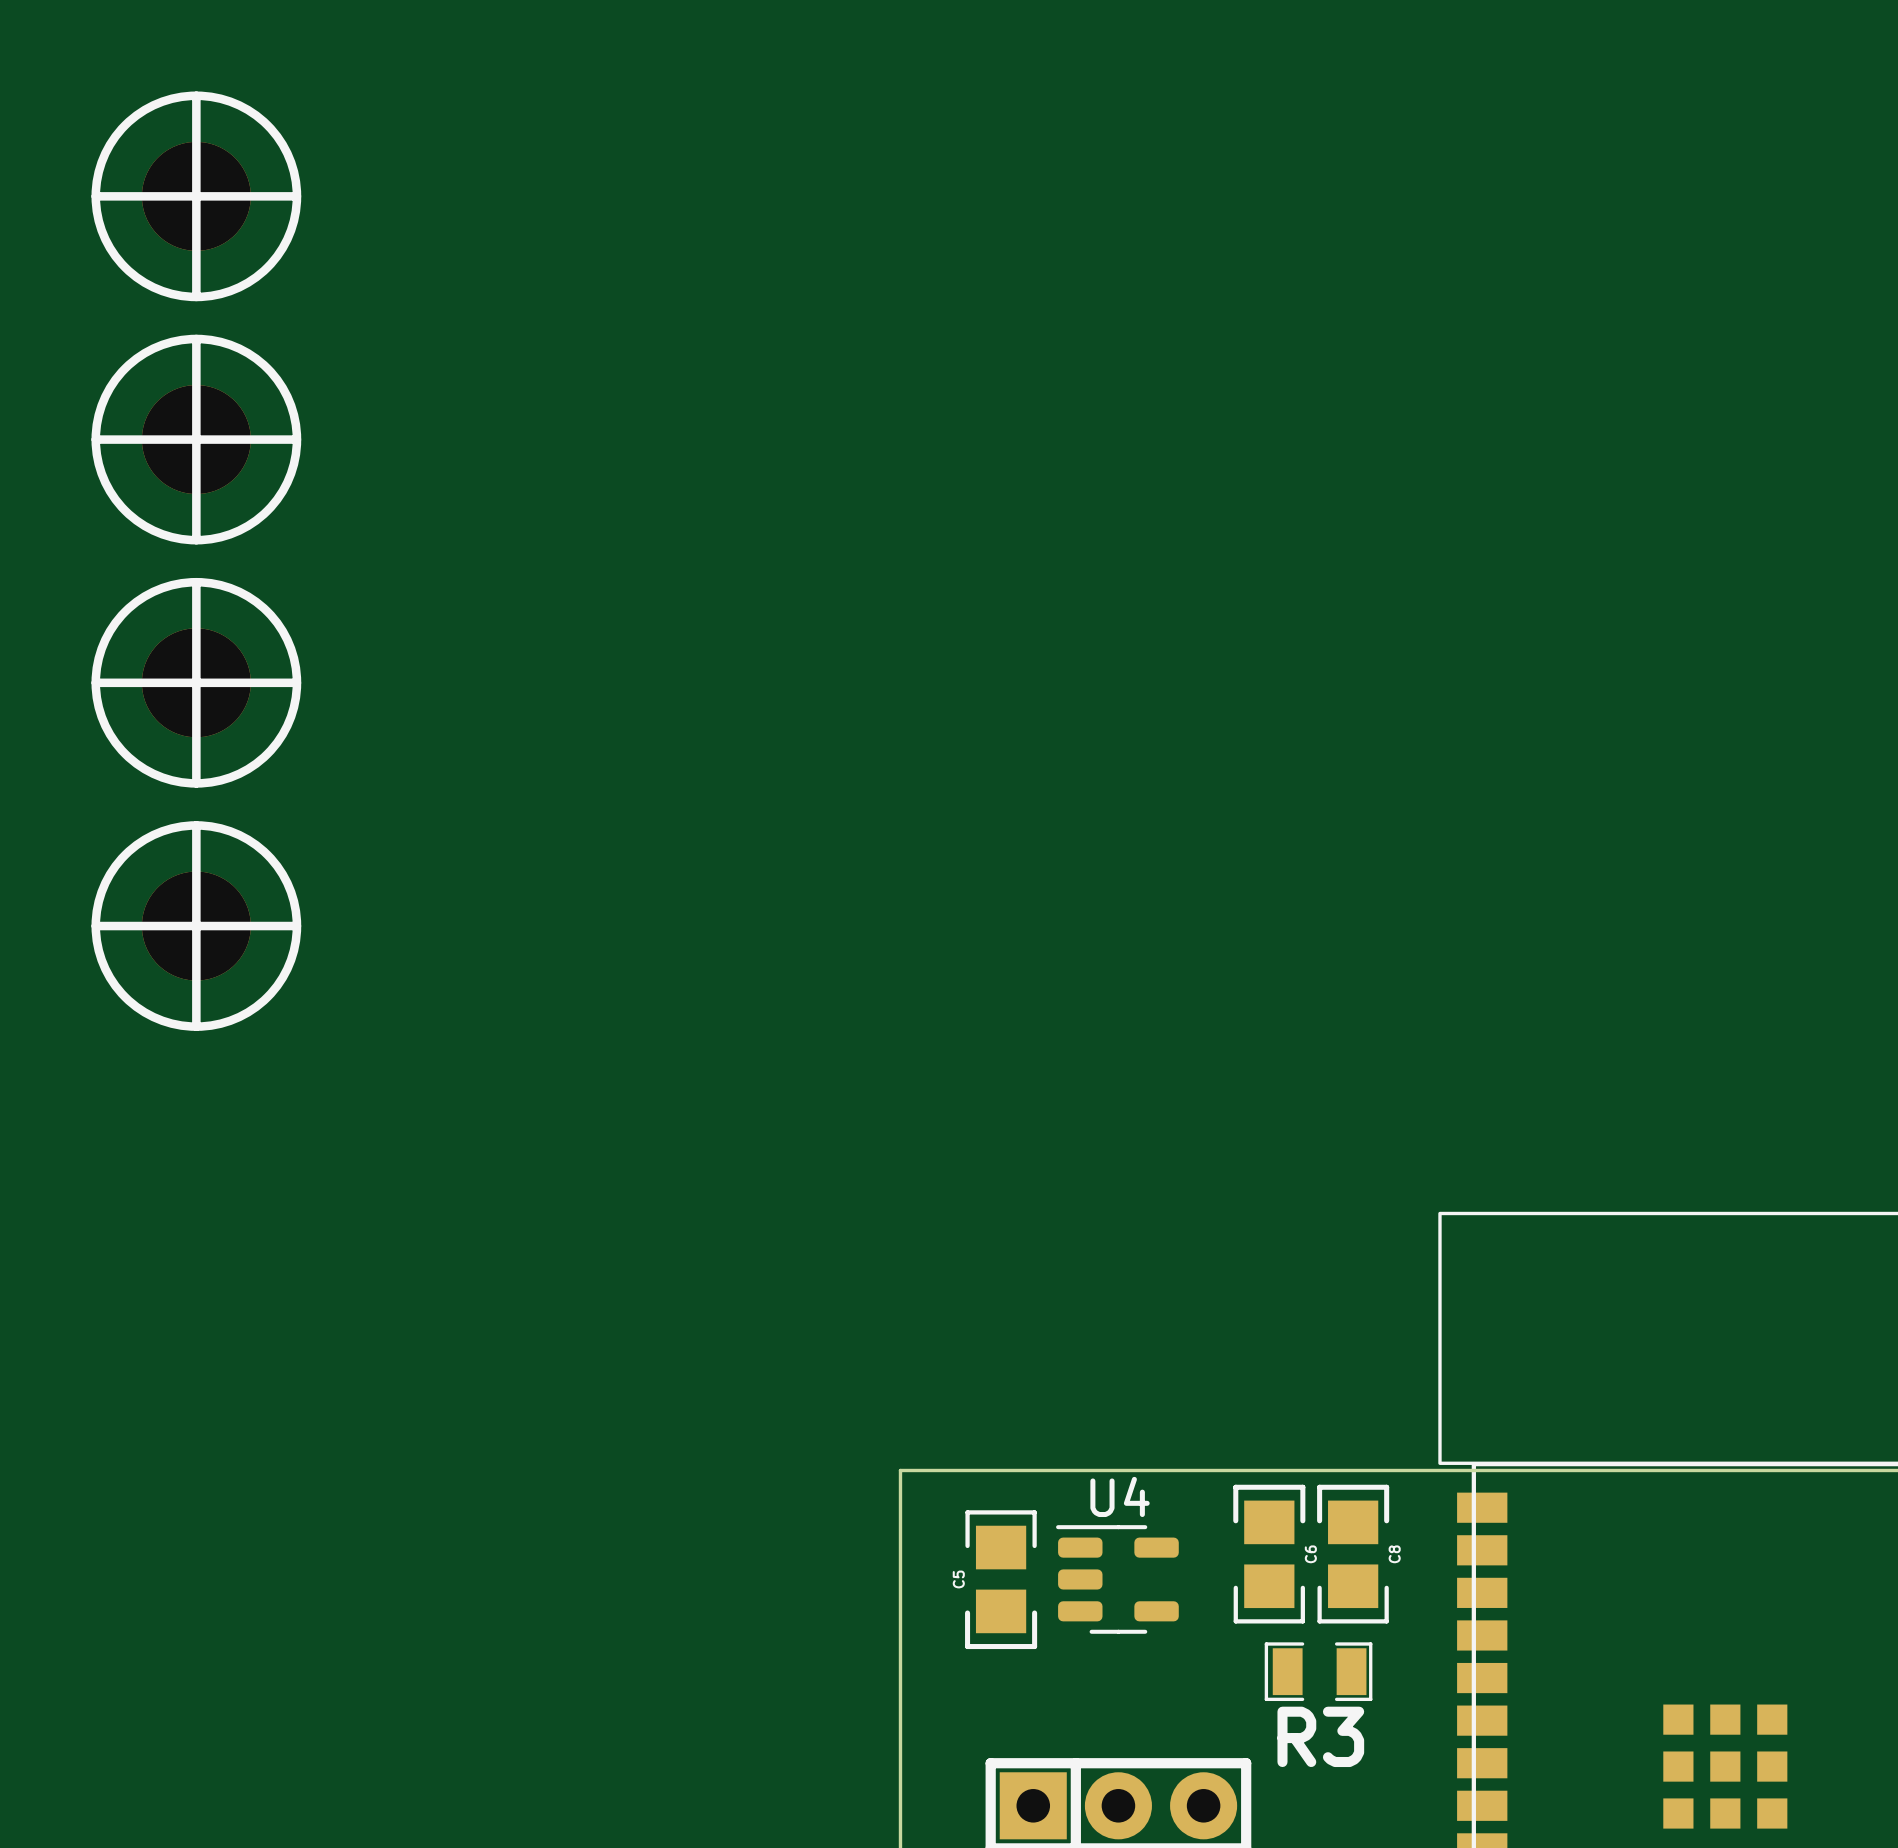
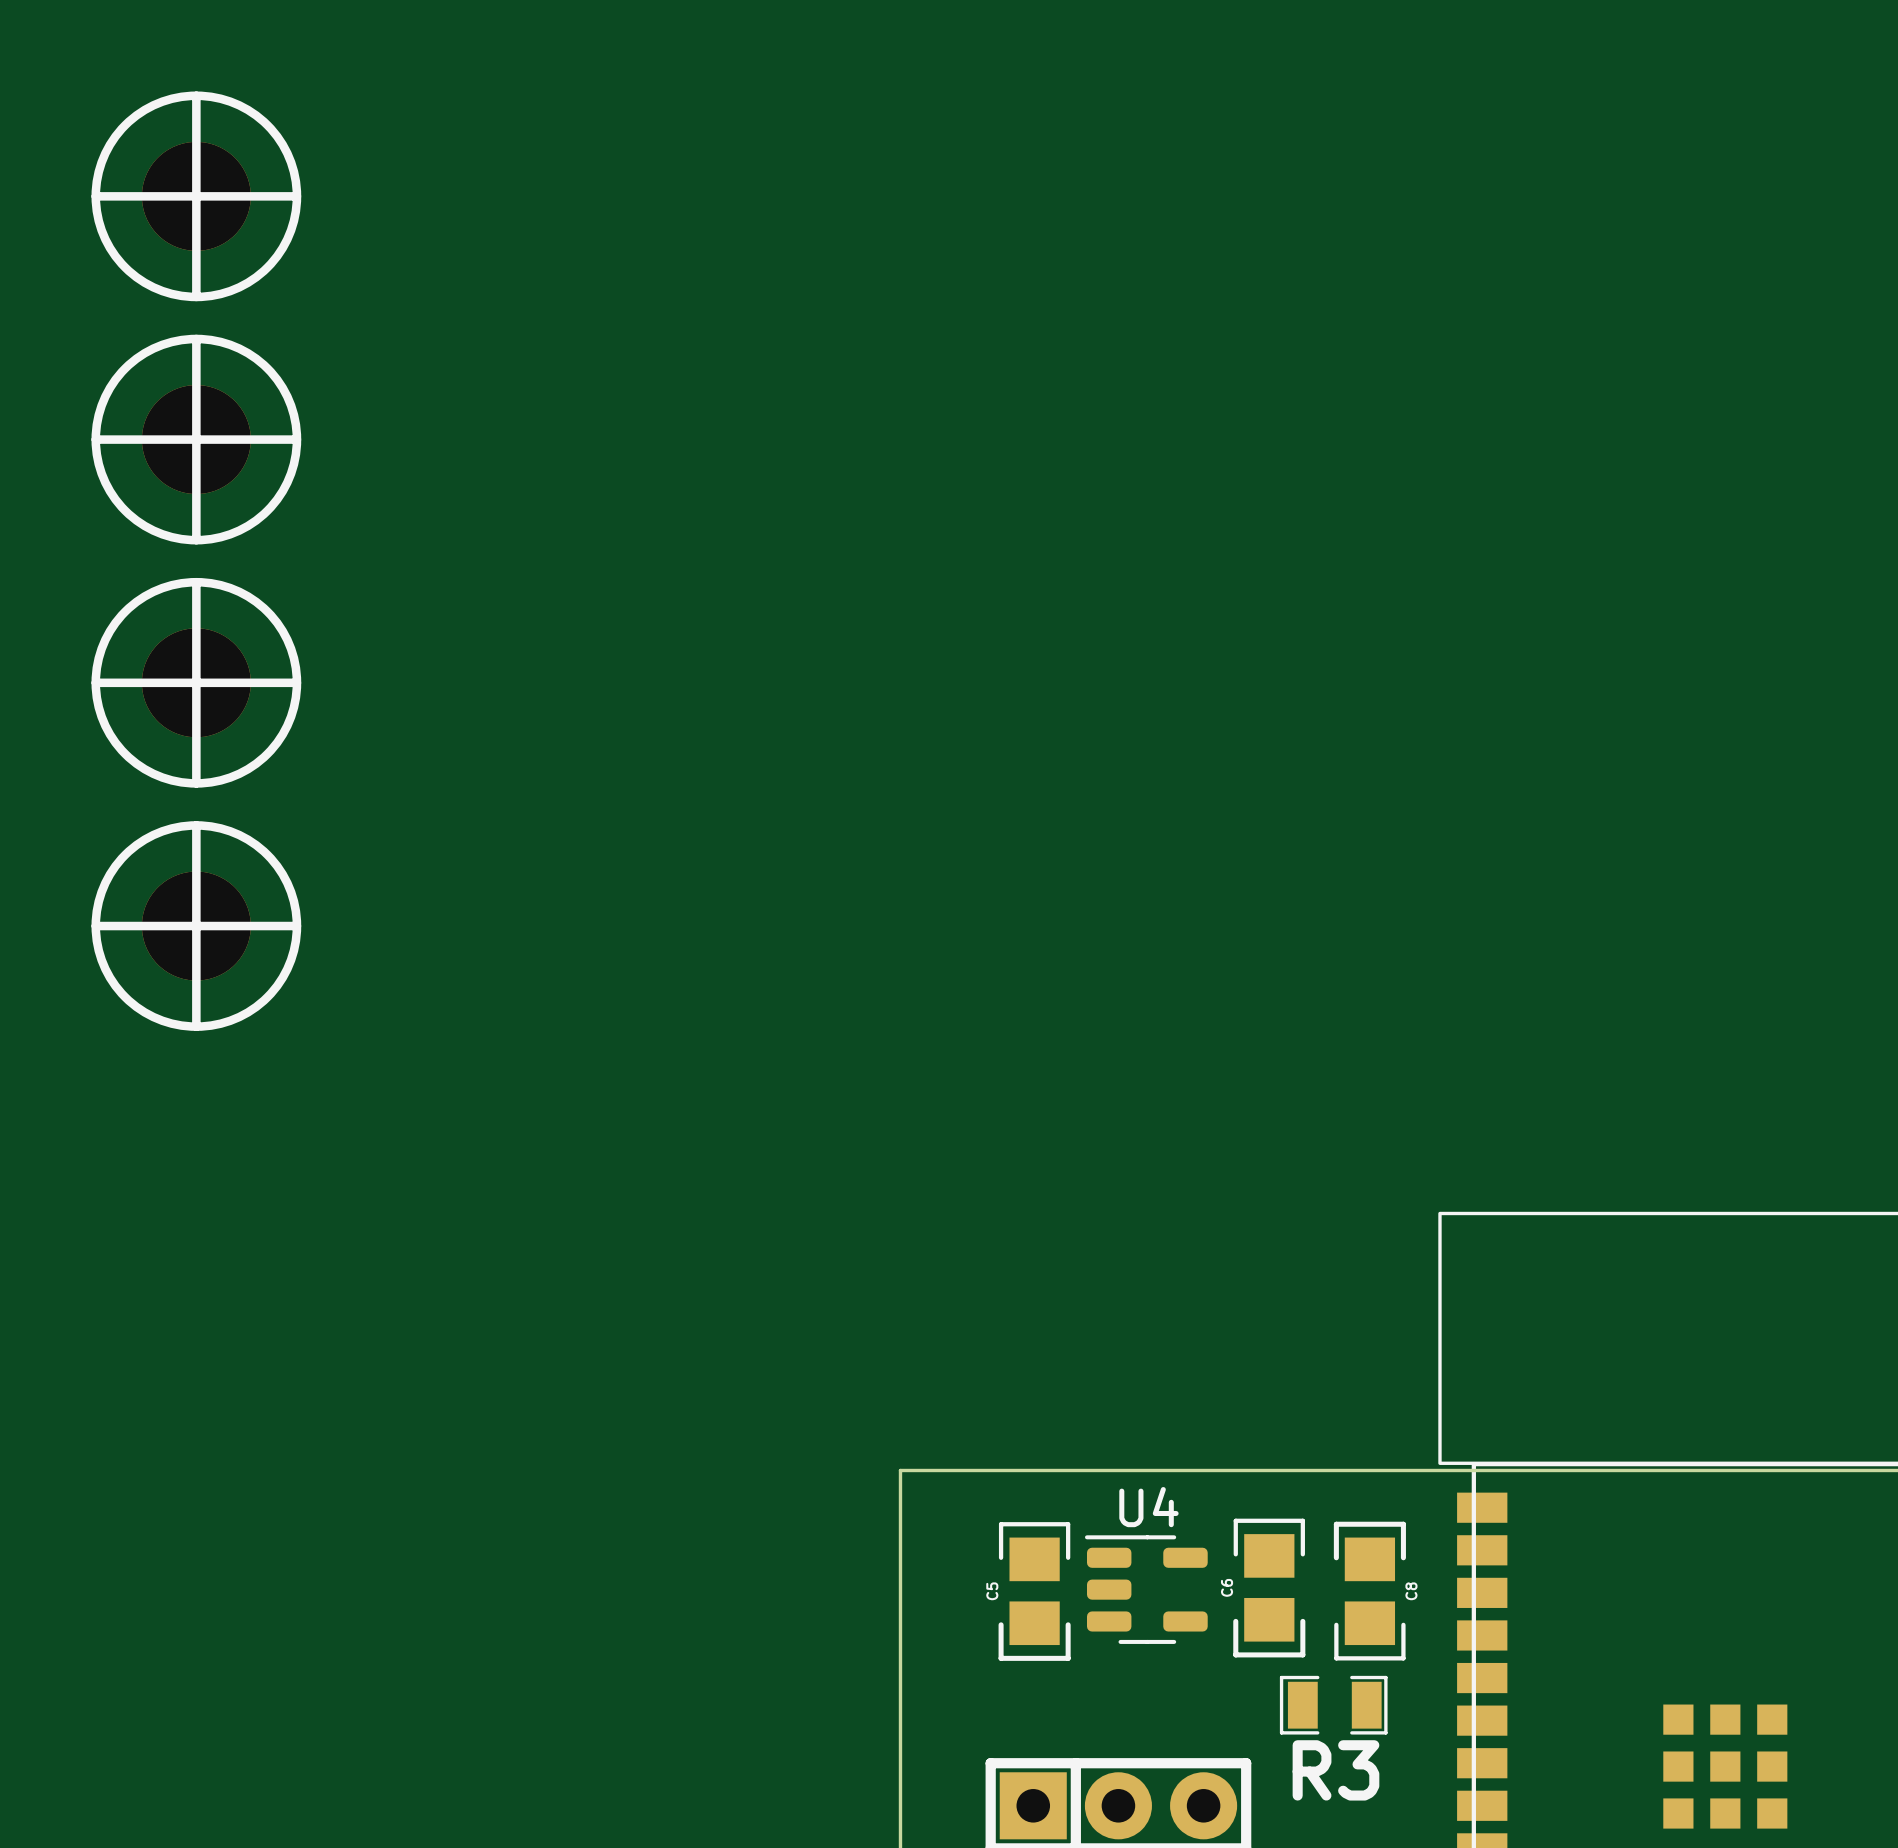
C6 rotation: 0° (1269, 1554) -> 180° (1269, 1588)
C8 position: (1353, 1554) -> (1369, 1591)
C5 position: (1001, 1579) -> (1034, 1591)
U4 position: (1117, 1579) -> (1146, 1589)
R3 position: (1318, 1671) -> (1333, 1705)

